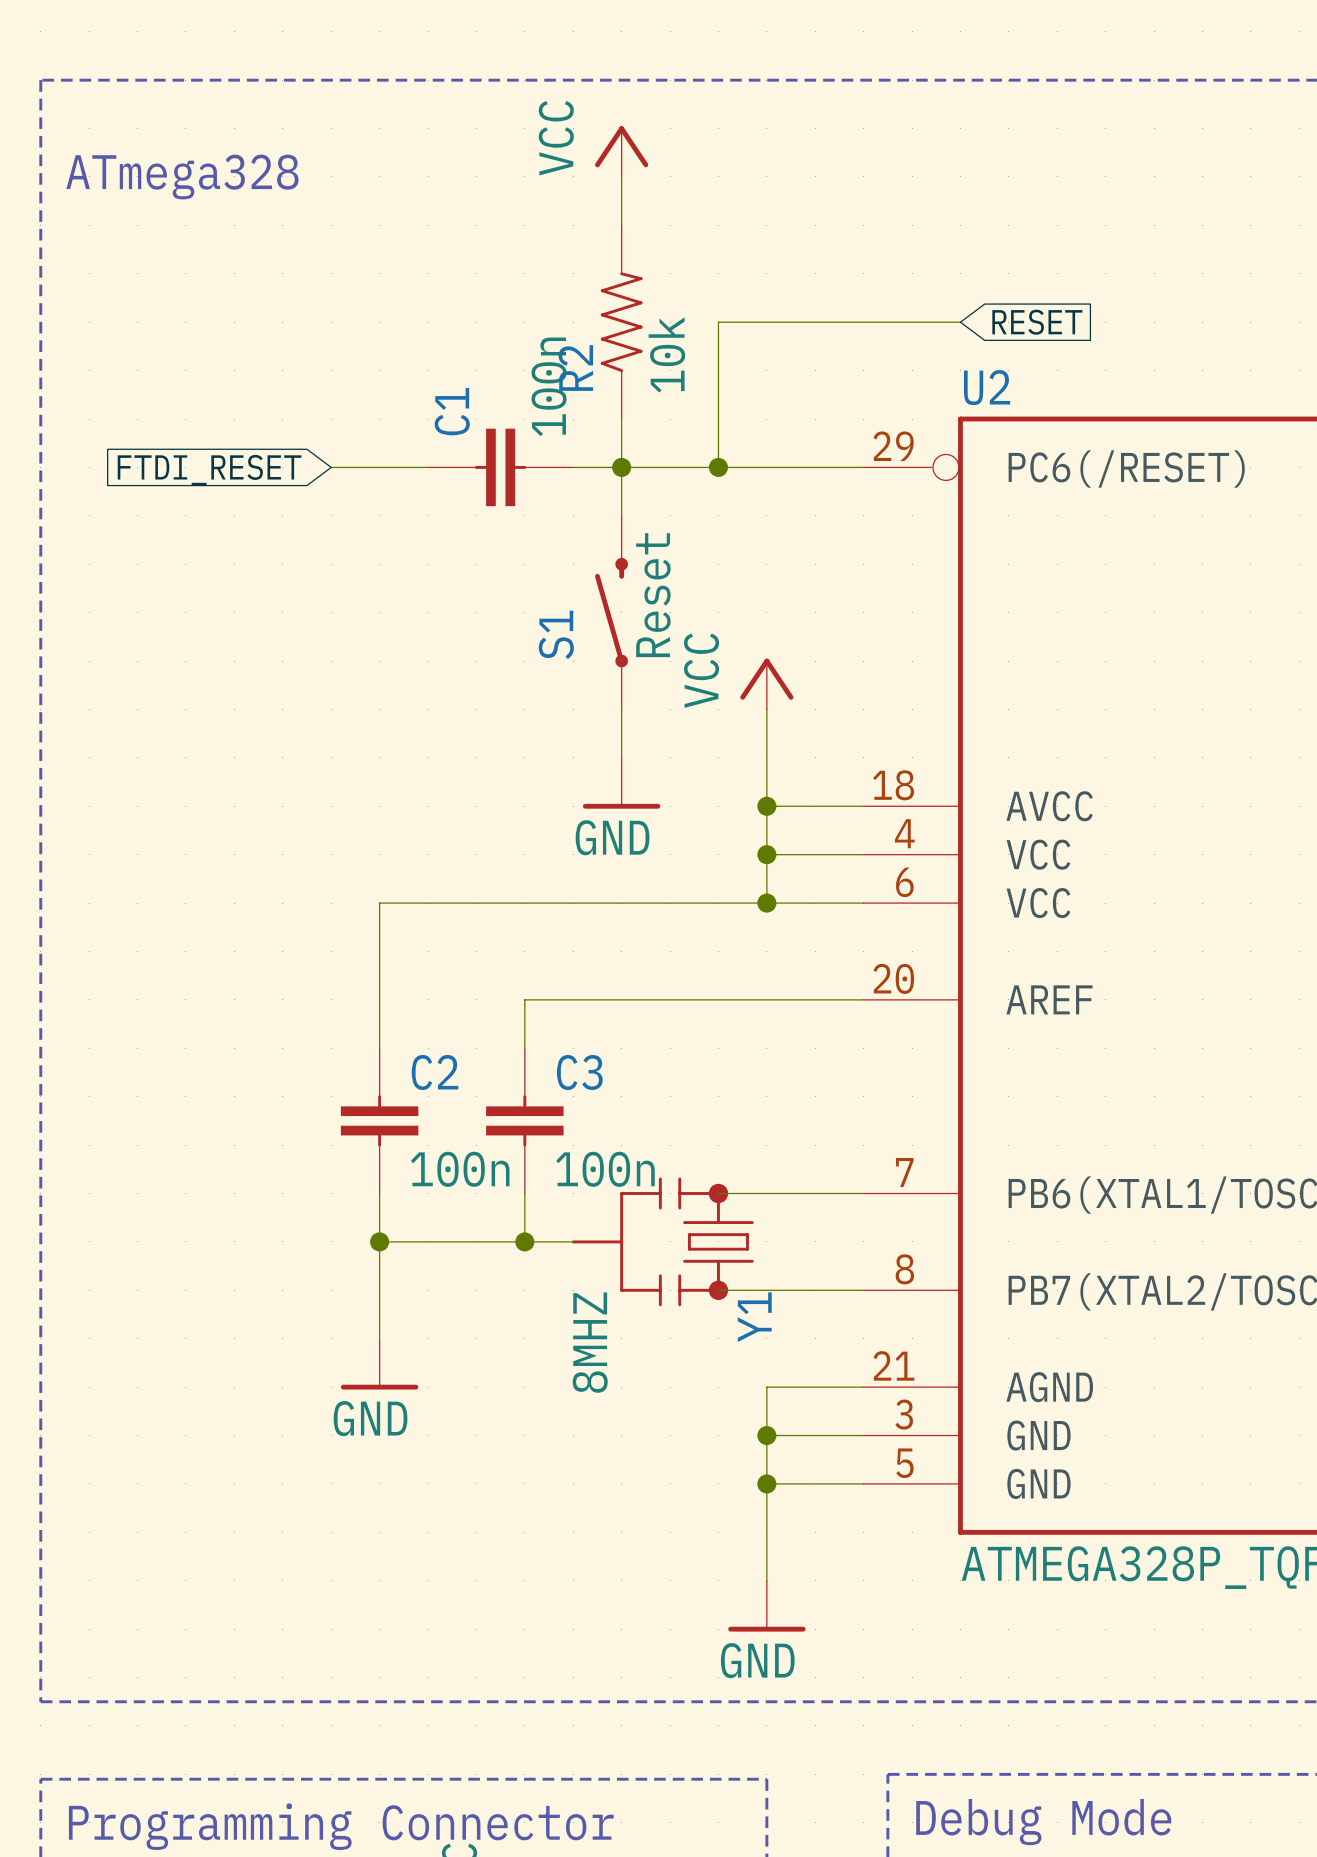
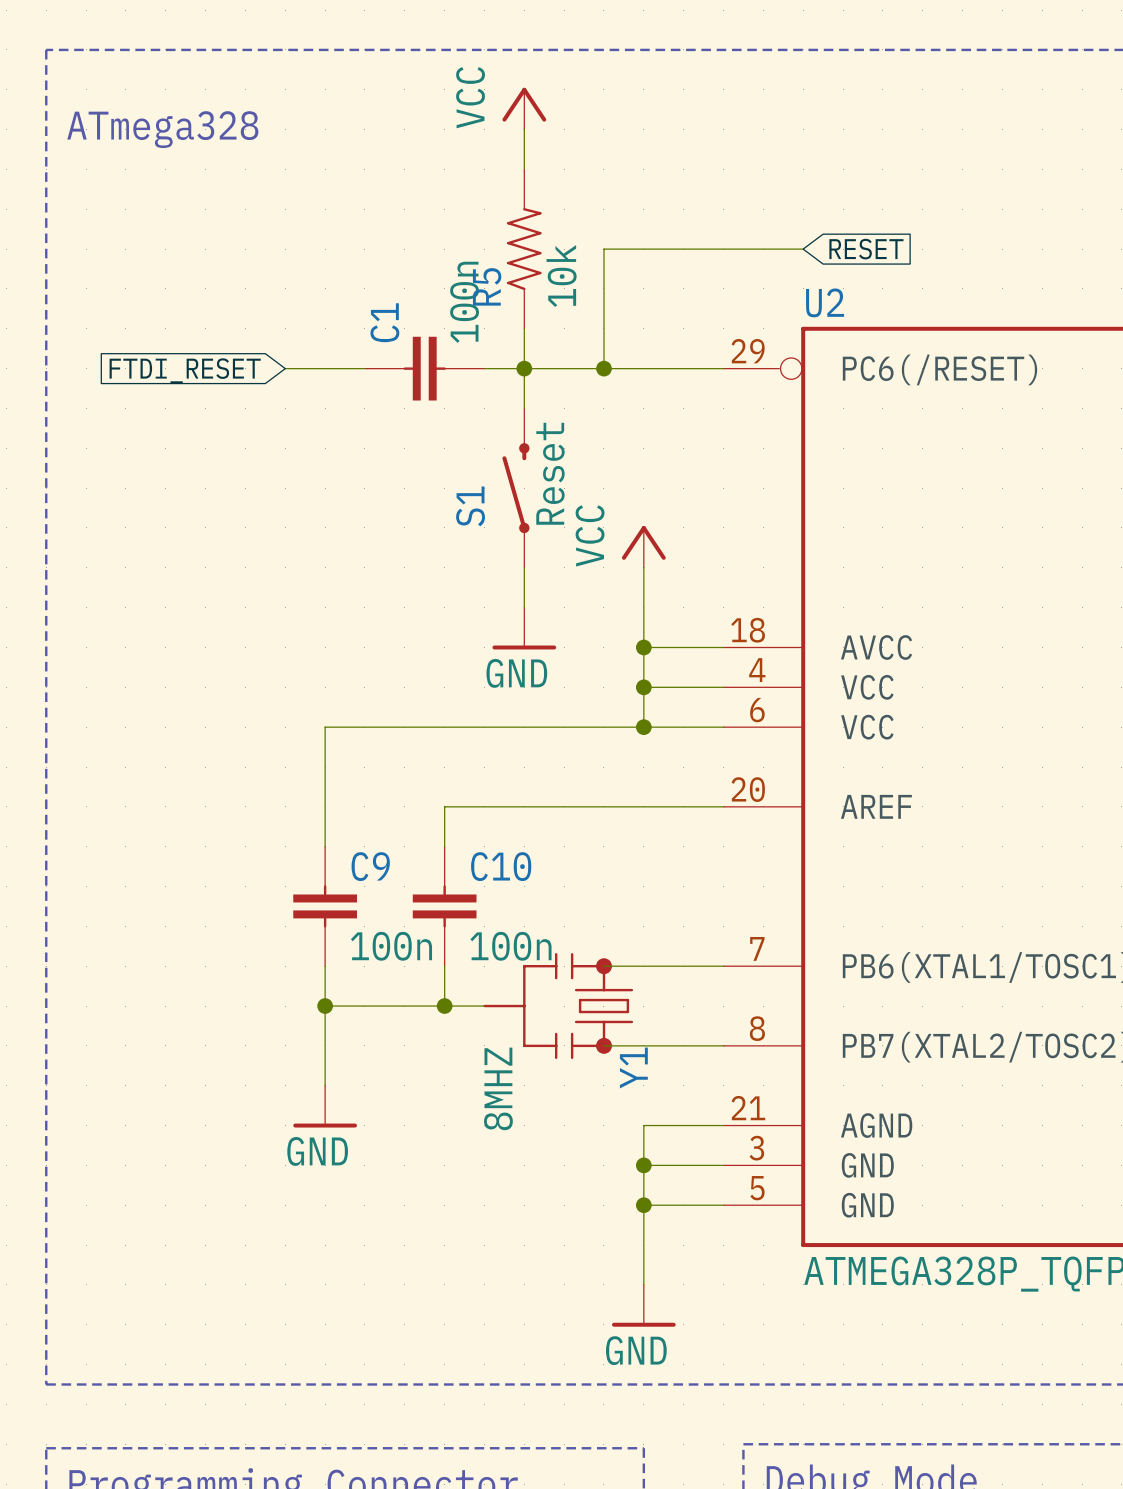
R2 name: R2 (575, 368) -> R5 (487, 286)
C2 name: C2 (435, 1072) -> C9 (370, 866)
C3 name: C3 (579, 1072) -> C10 (501, 866)

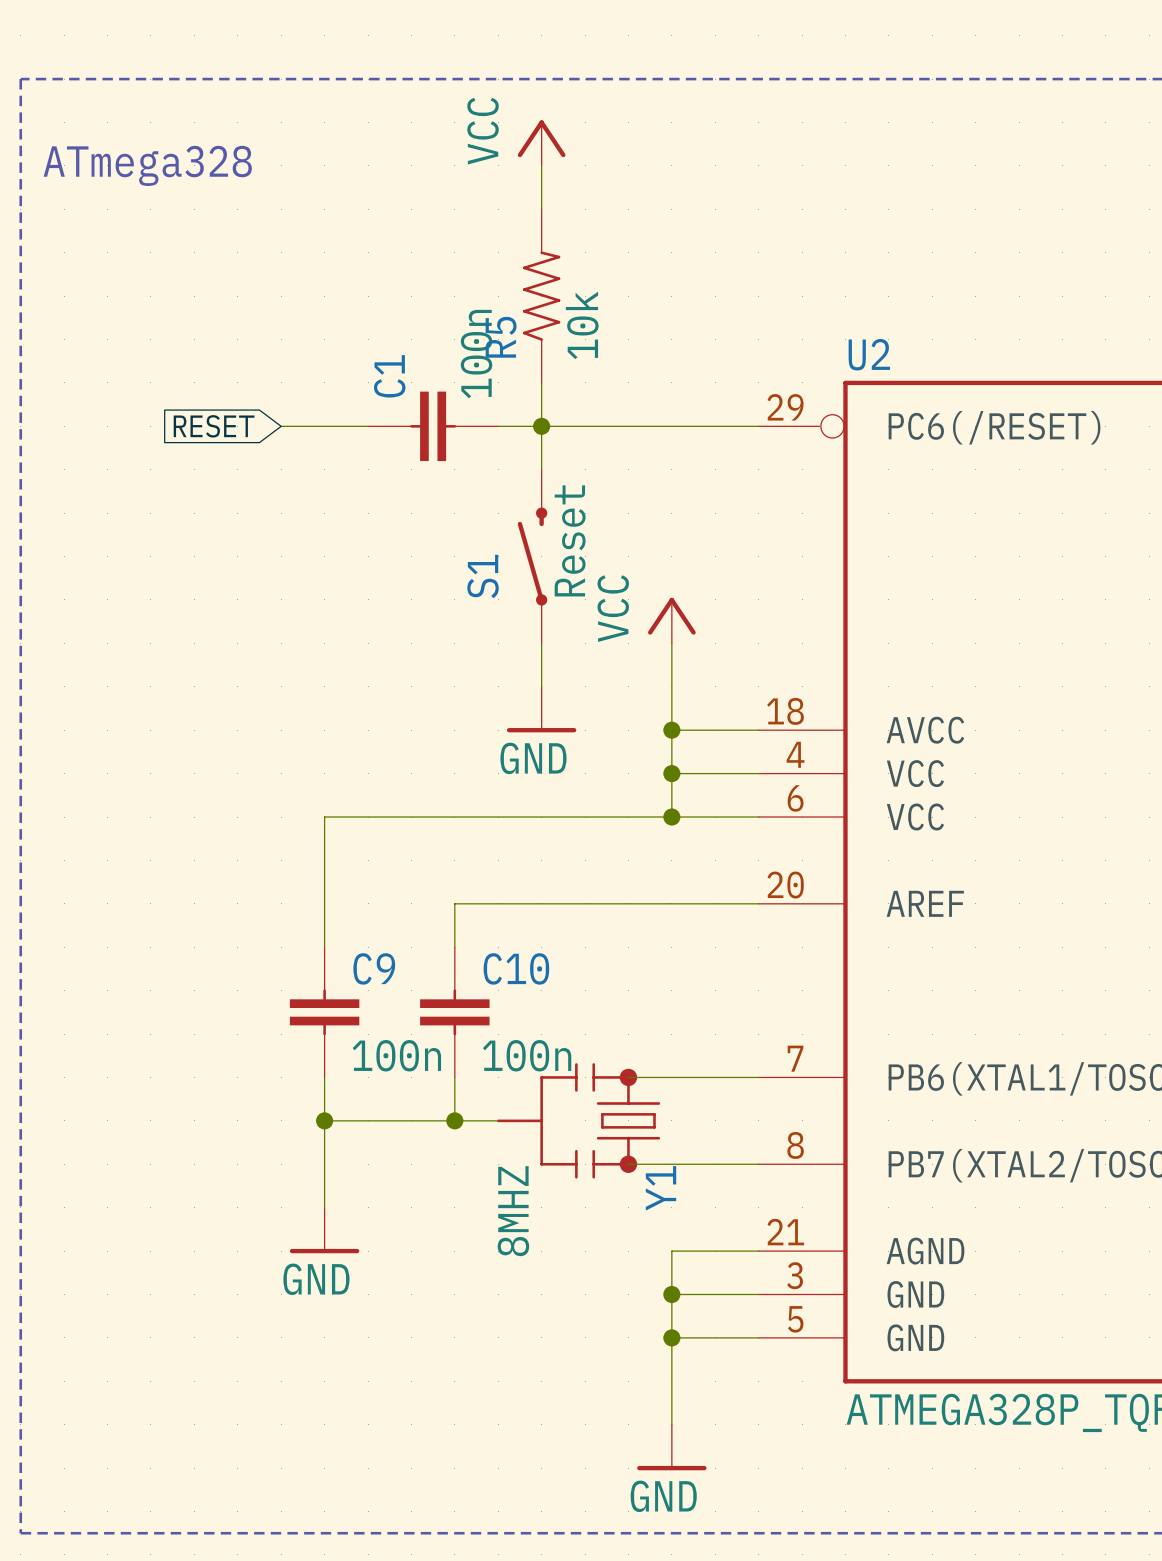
wire: (803, 249) (603, 249) (603, 368) -> none
global label: RESET (866, 249) -> none
junction: (603, 368) -> none
global label: FTDI_RESET (185, 370) -> RESET (214, 426)

